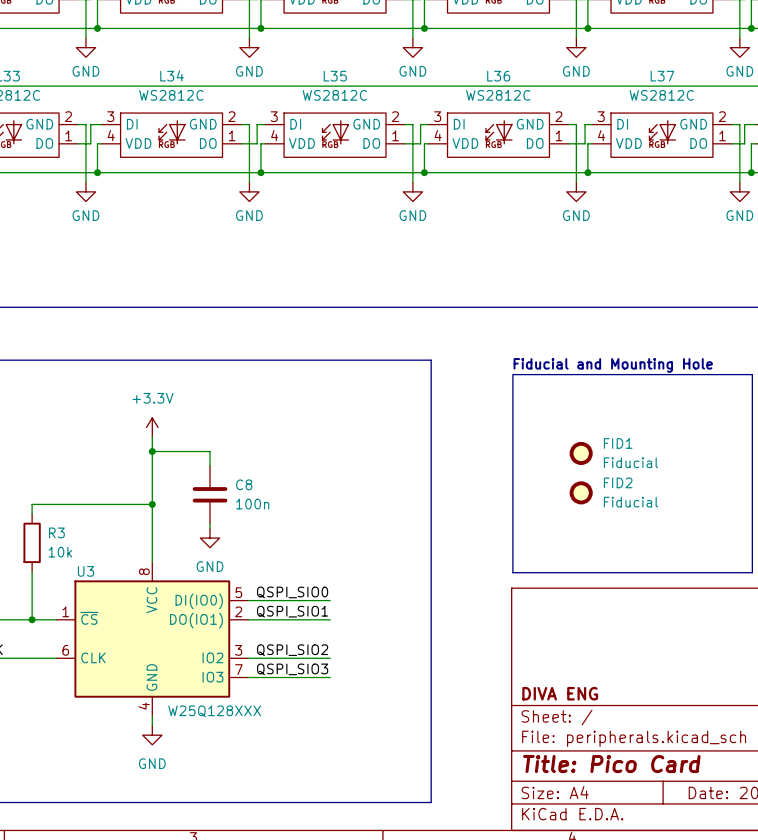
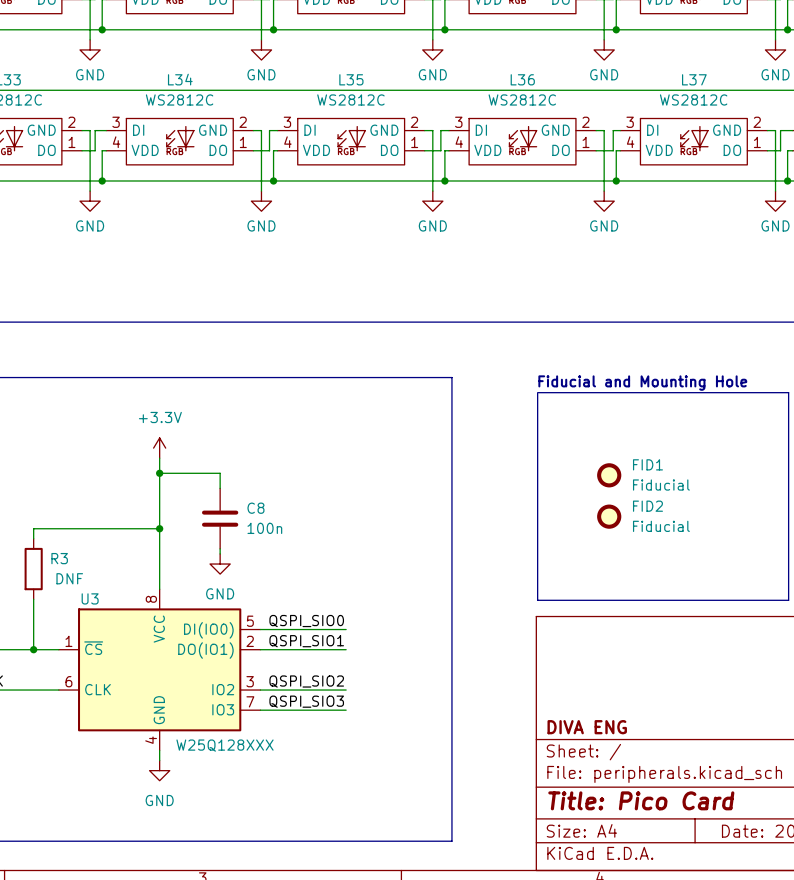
R3 value: 10k (60, 552) -> DNF (69, 578)

